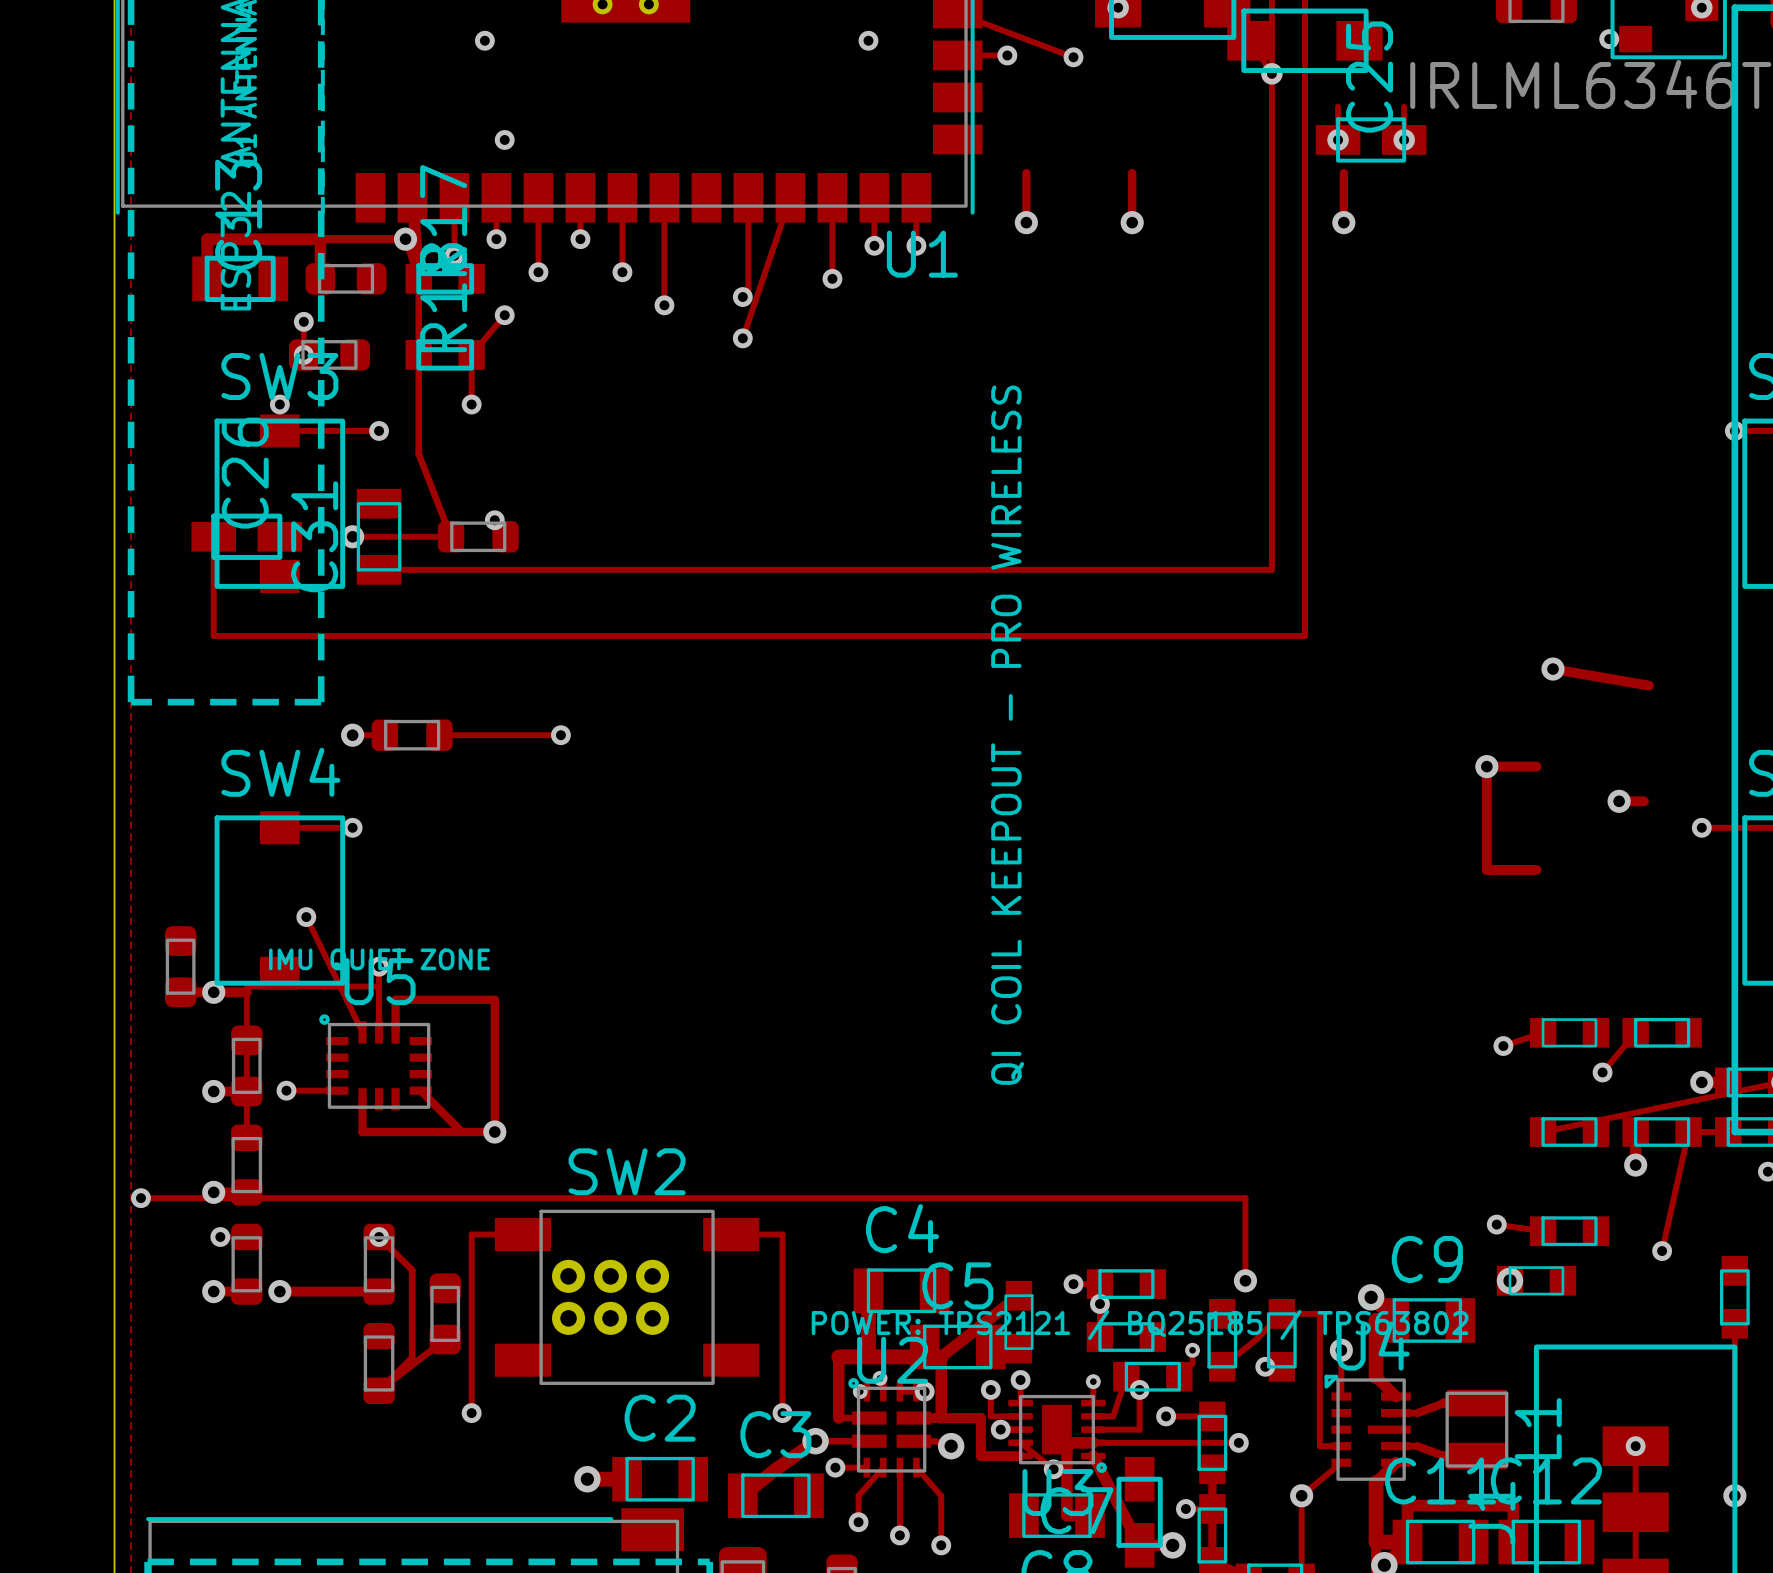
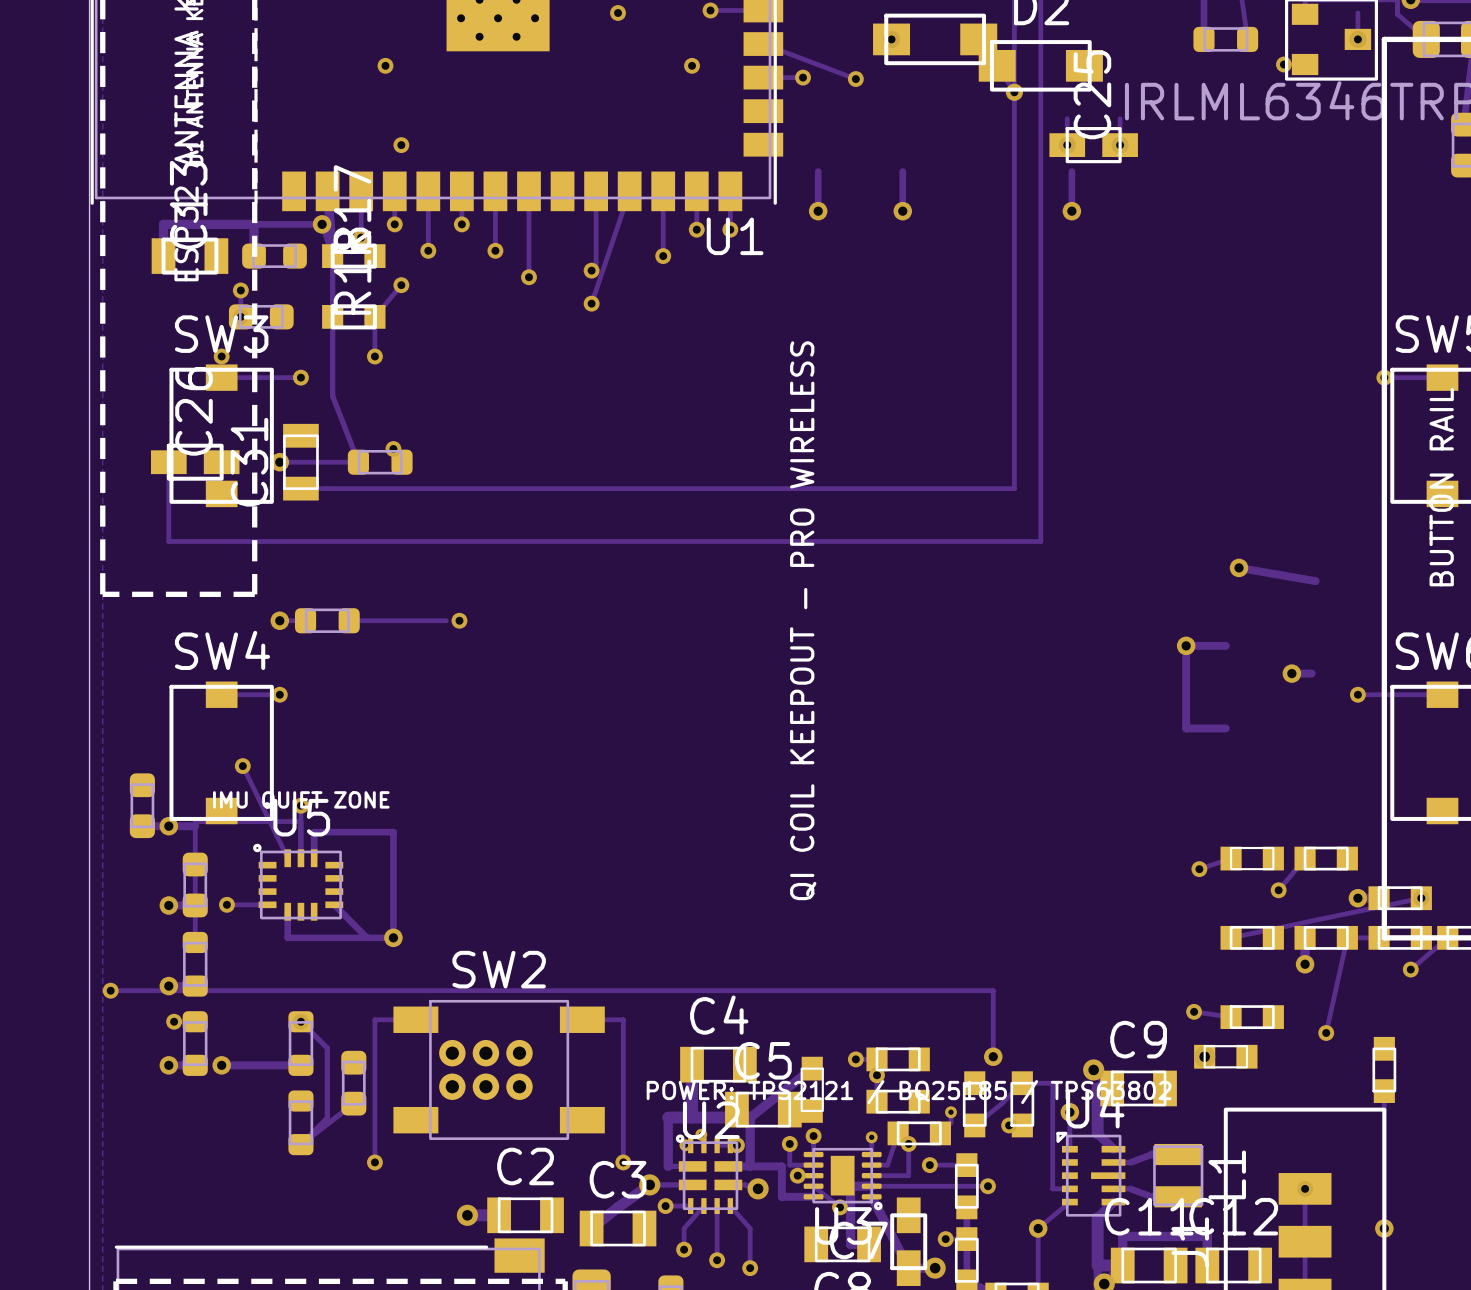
via position: (560, 735) -> (459, 620)

